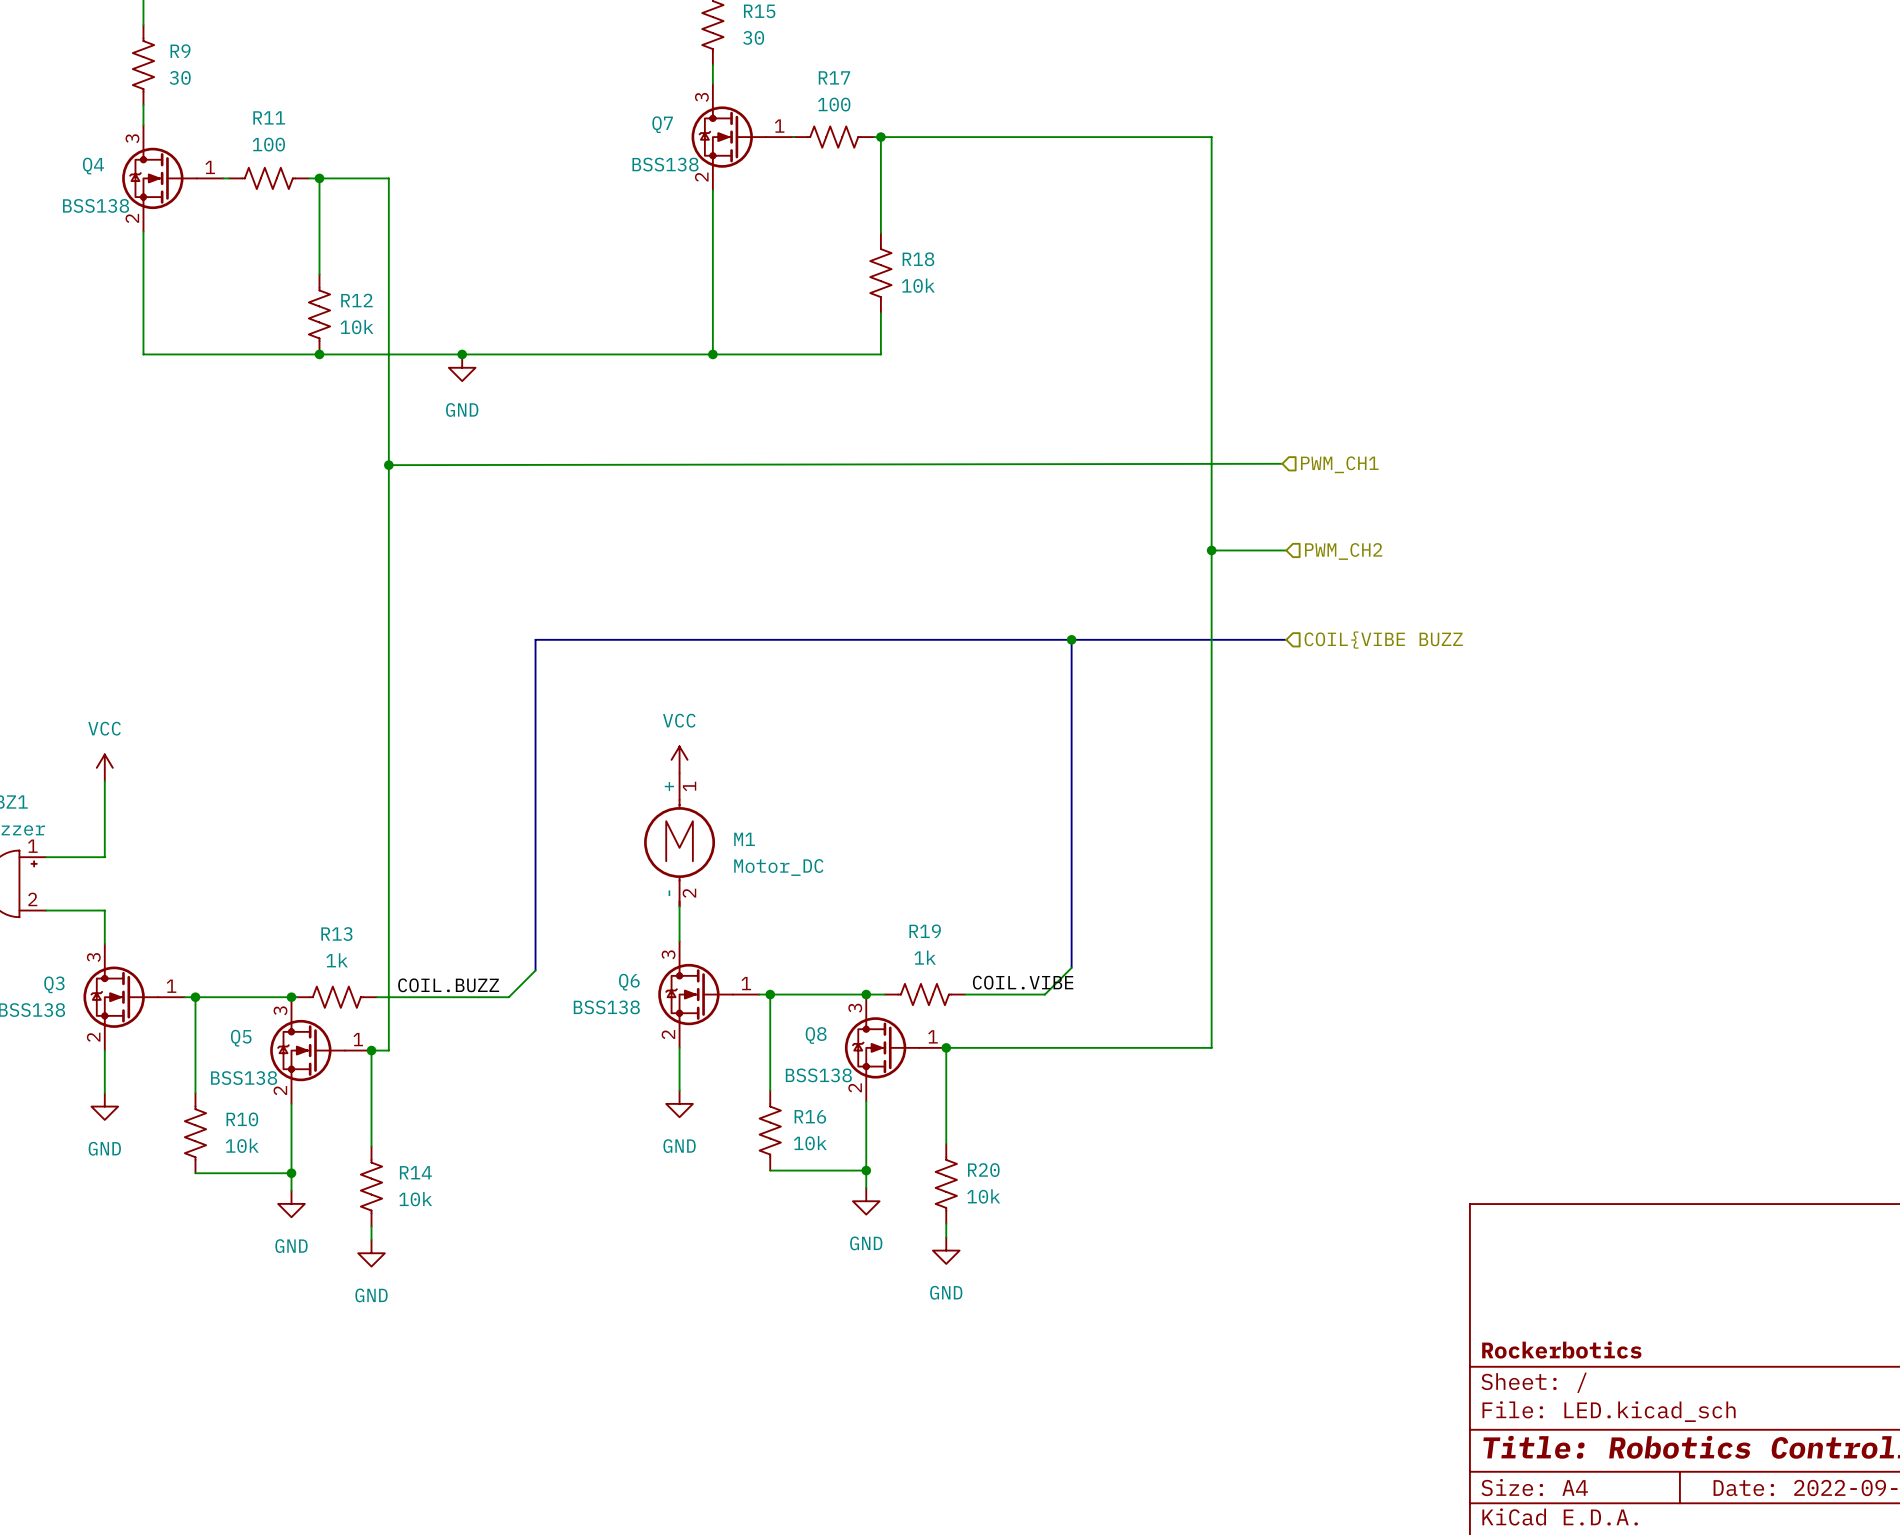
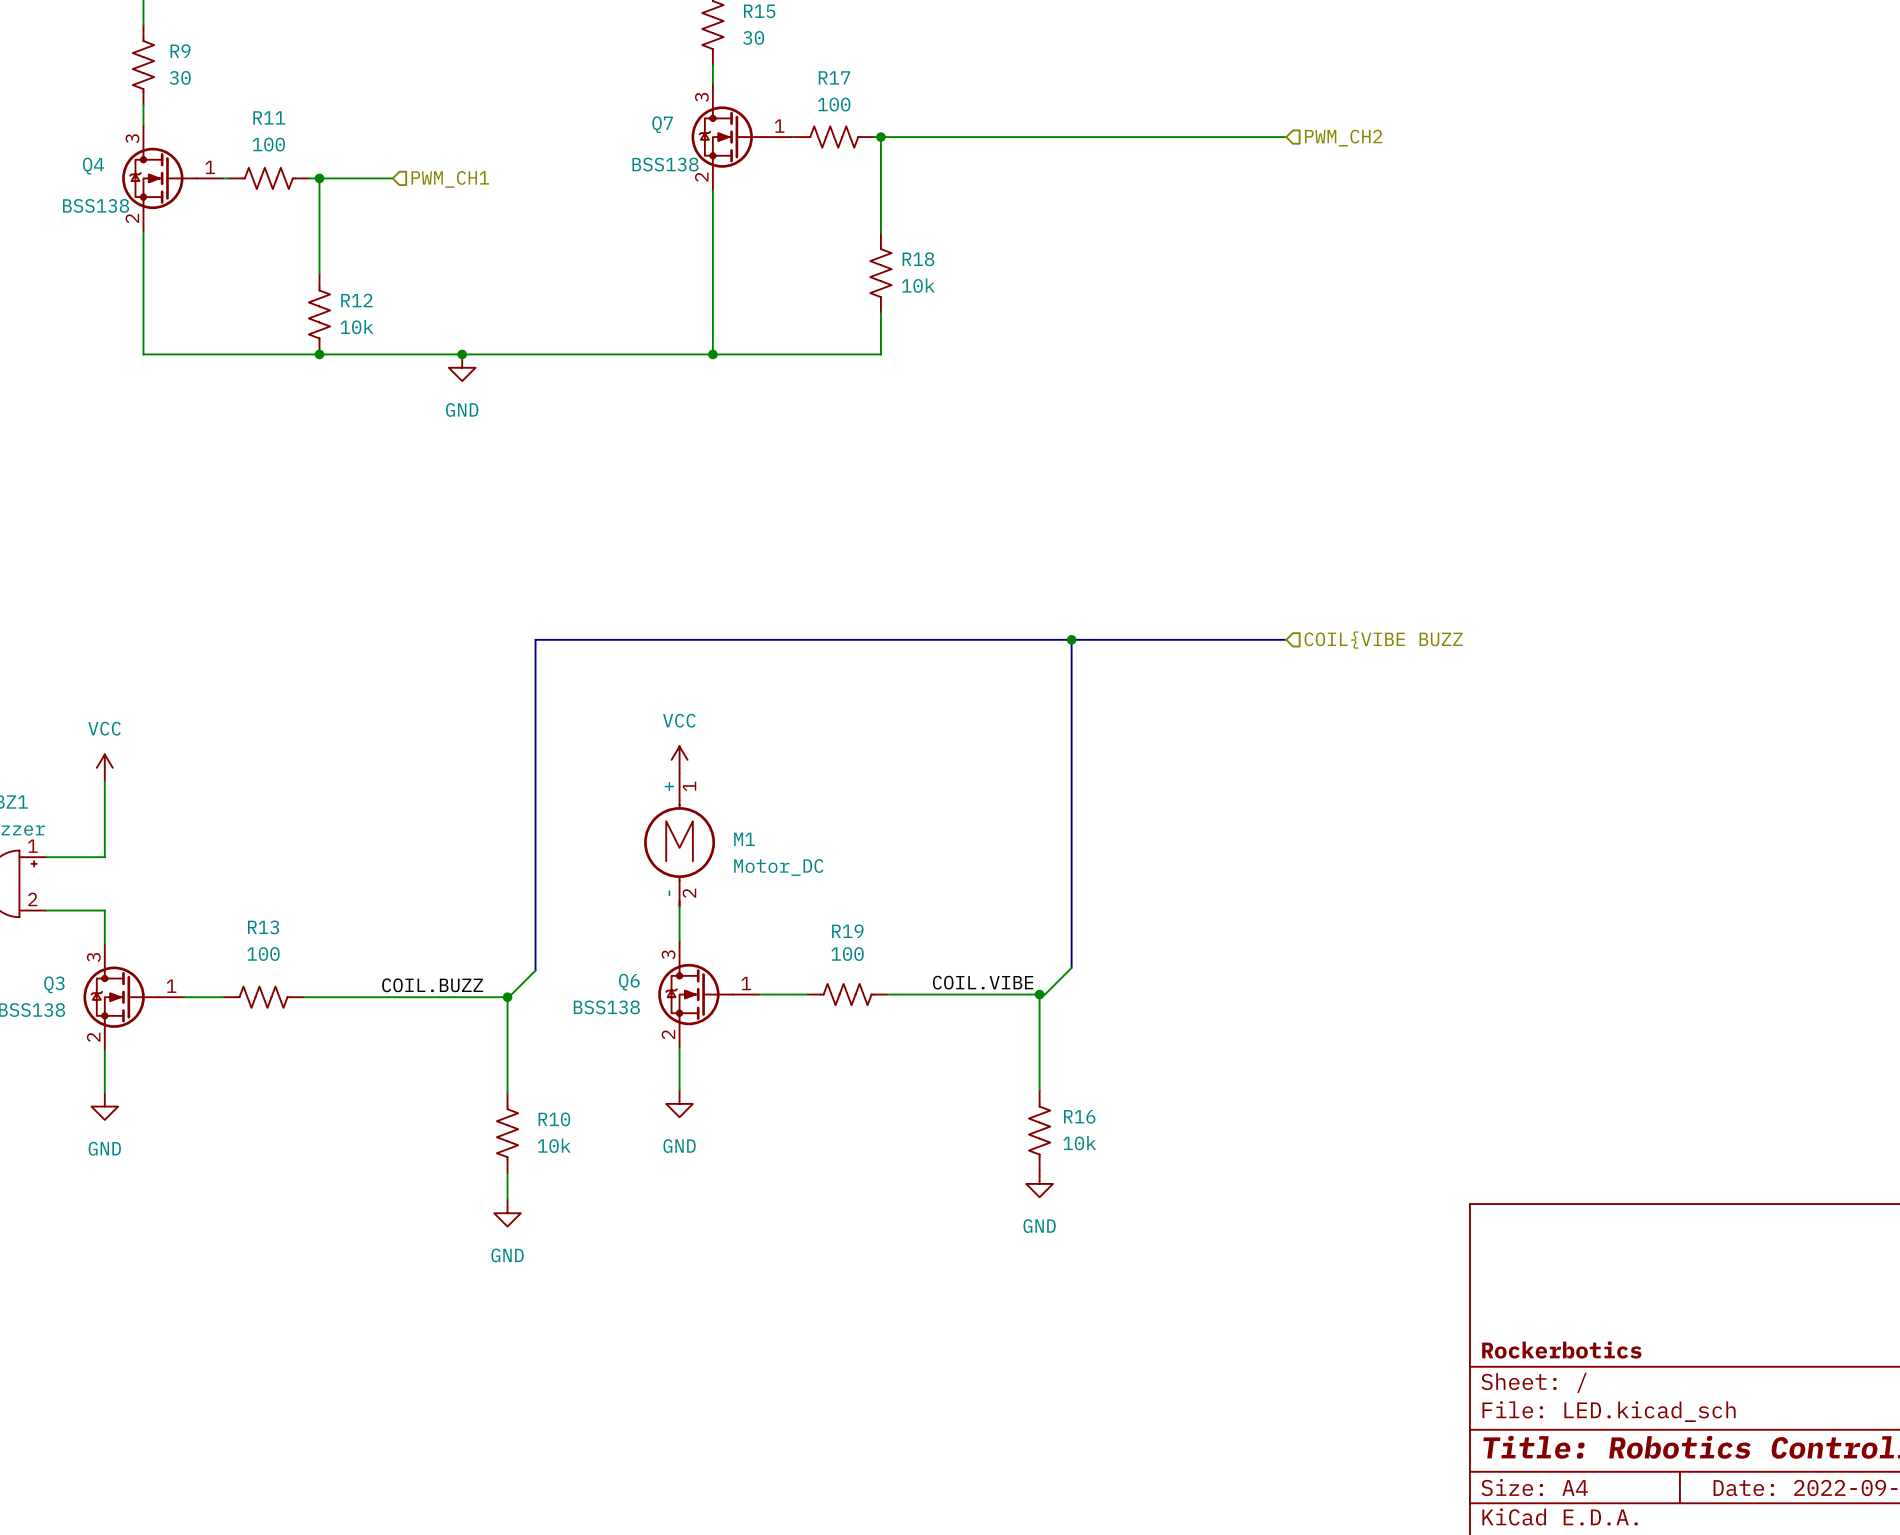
wire: (1211, 137) (1211, 1047) (946, 1047) (946, 1143) -> (1211, 137) (1286, 137)
hierarchical label: none -> PWM_CH2 (1343, 138)
wire: (388, 178) (388, 1050) (371, 1050) (371, 1146) -> (388, 178) (392, 178)
hierarchical label: none -> PWM_CH1 (450, 179)
wire: (1282, 463) (388, 465) -> none
hierarchical label: PWM_CH1 (1339, 464) -> none
junction: (388, 465) -> none
wire: (1211, 550) (1286, 550) -> none
junction: (1211, 550) -> none
hierarchical label: PWM_CH2 (1343, 551) -> none
R13 name position: R13 (336, 934) -> R13 (263, 927)
R19 value: 1k (925, 957) -> 100 (847, 954)
R13 value: 1k (337, 960) -> 100 (263, 954)
label position: COIL.VIBE (1023, 982) -> COIL.VIBE (983, 982)
label position: COIL.BUZZ (448, 985) -> COIL.BUZZ (432, 985)
wire: (770, 994) (770, 1090) -> none
junction: (770, 994) -> none
junction: (866, 994) -> none
R19 position: (924, 994) -> (847, 994)
wire: none -> (1039, 994) (1039, 1090)
junction: none -> (1039, 994)
wire: (195, 997) (195, 1093) -> none
junction: (195, 997) -> none
junction: (291, 997) -> none
R13 position: (336, 997) -> (263, 997)
wire: none -> (507, 997) (507, 1093)
junction: none -> (507, 997)
Q8: BSS138 (895, 1047) -> none
junction: (946, 1047) -> none
Q5: BSS138 (320, 1050) -> none
junction: (371, 1050) -> none
wire: (866, 1101) (866, 1187) -> none
wire: (291, 1103) (291, 1190) -> none
R16 position: (770, 1130) -> (1039, 1130)
R10 position: (195, 1133) -> (507, 1133)
wire: (770, 1170) (866, 1170) -> none
junction: (866, 1170) -> none
wire: (195, 1173) (291, 1173) -> none
junction: (291, 1173) -> none
wire: none -> (507, 1173) (507, 1199)
R20: 10k (946, 1183) -> none
power symbol: none -> GND (1039, 1183)
R14: 10k (371, 1186) -> none
power symbol: GND (866, 1201) -> none
power symbol: GND (291, 1203) -> none
power symbol: none -> GND (507, 1213)
wire: (946, 1223) (946, 1237) -> none
wire: (371, 1226) (371, 1239) -> none
power symbol: GND (946, 1250) -> none
power symbol: GND (371, 1253) -> none

